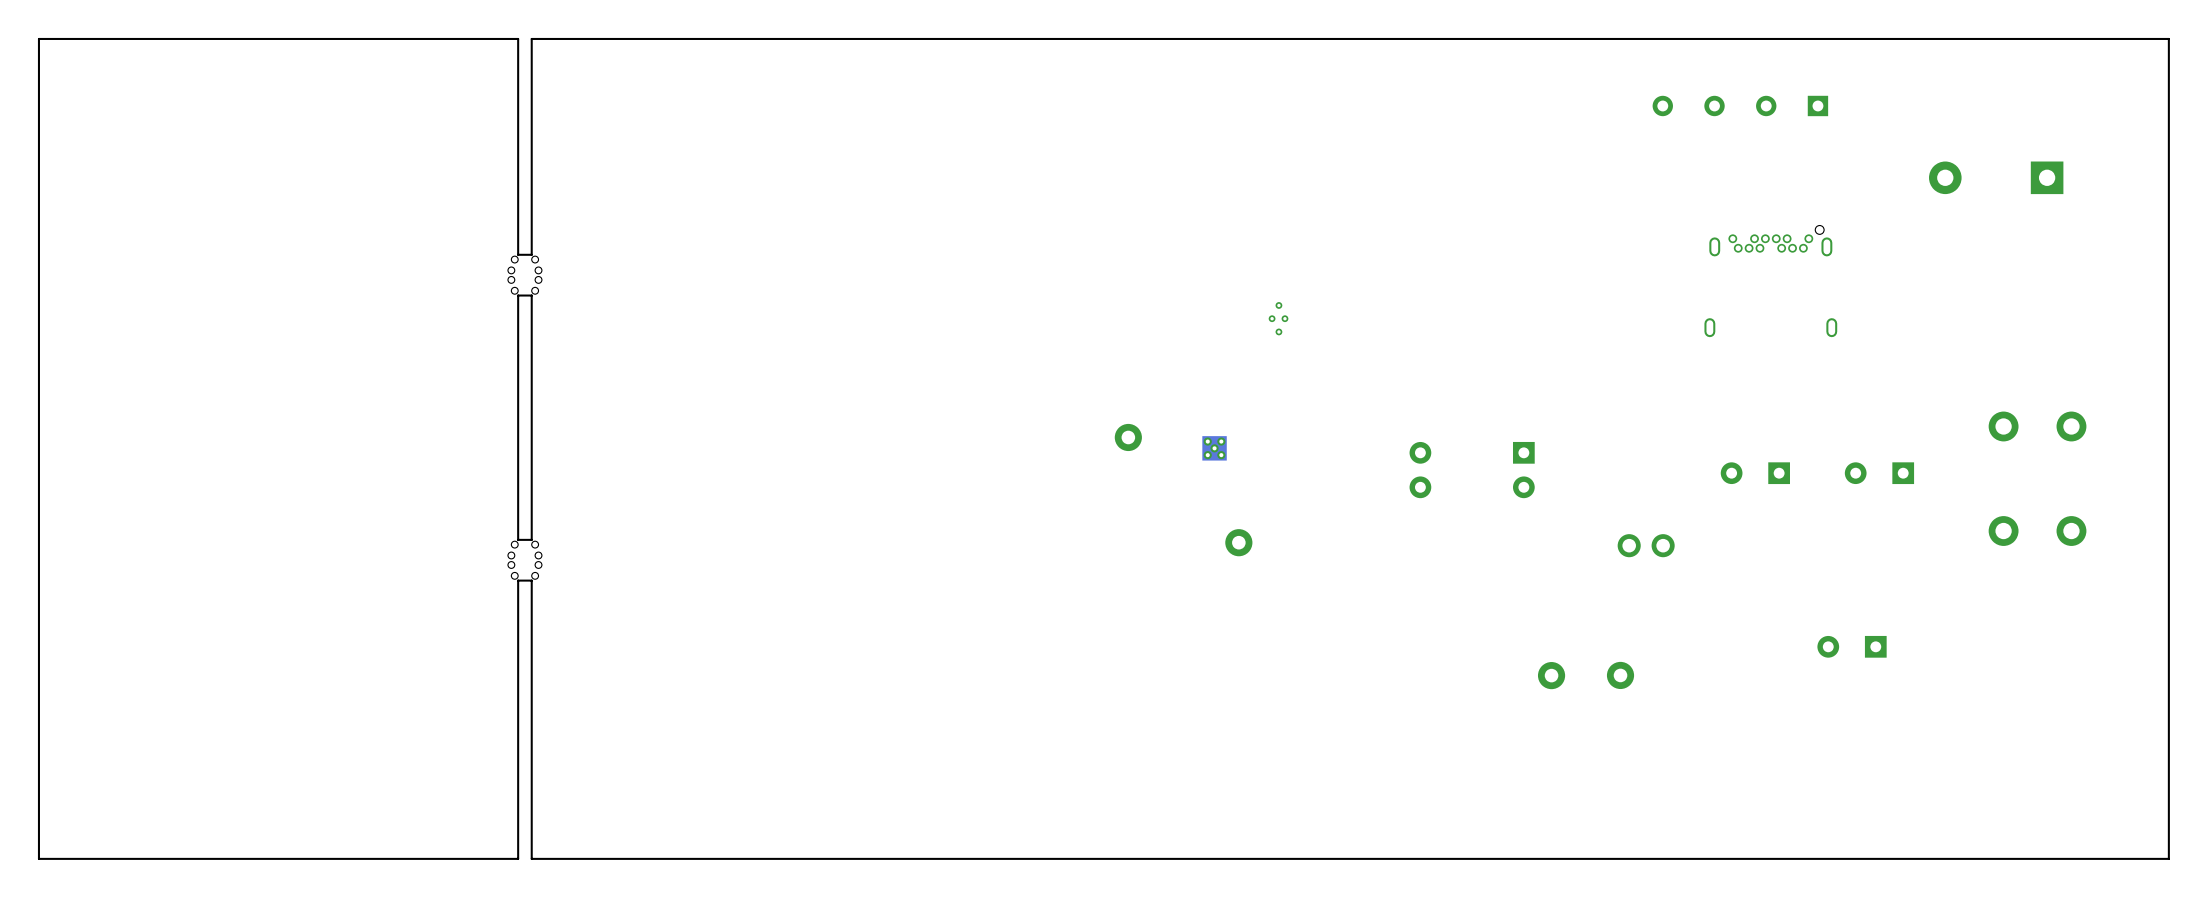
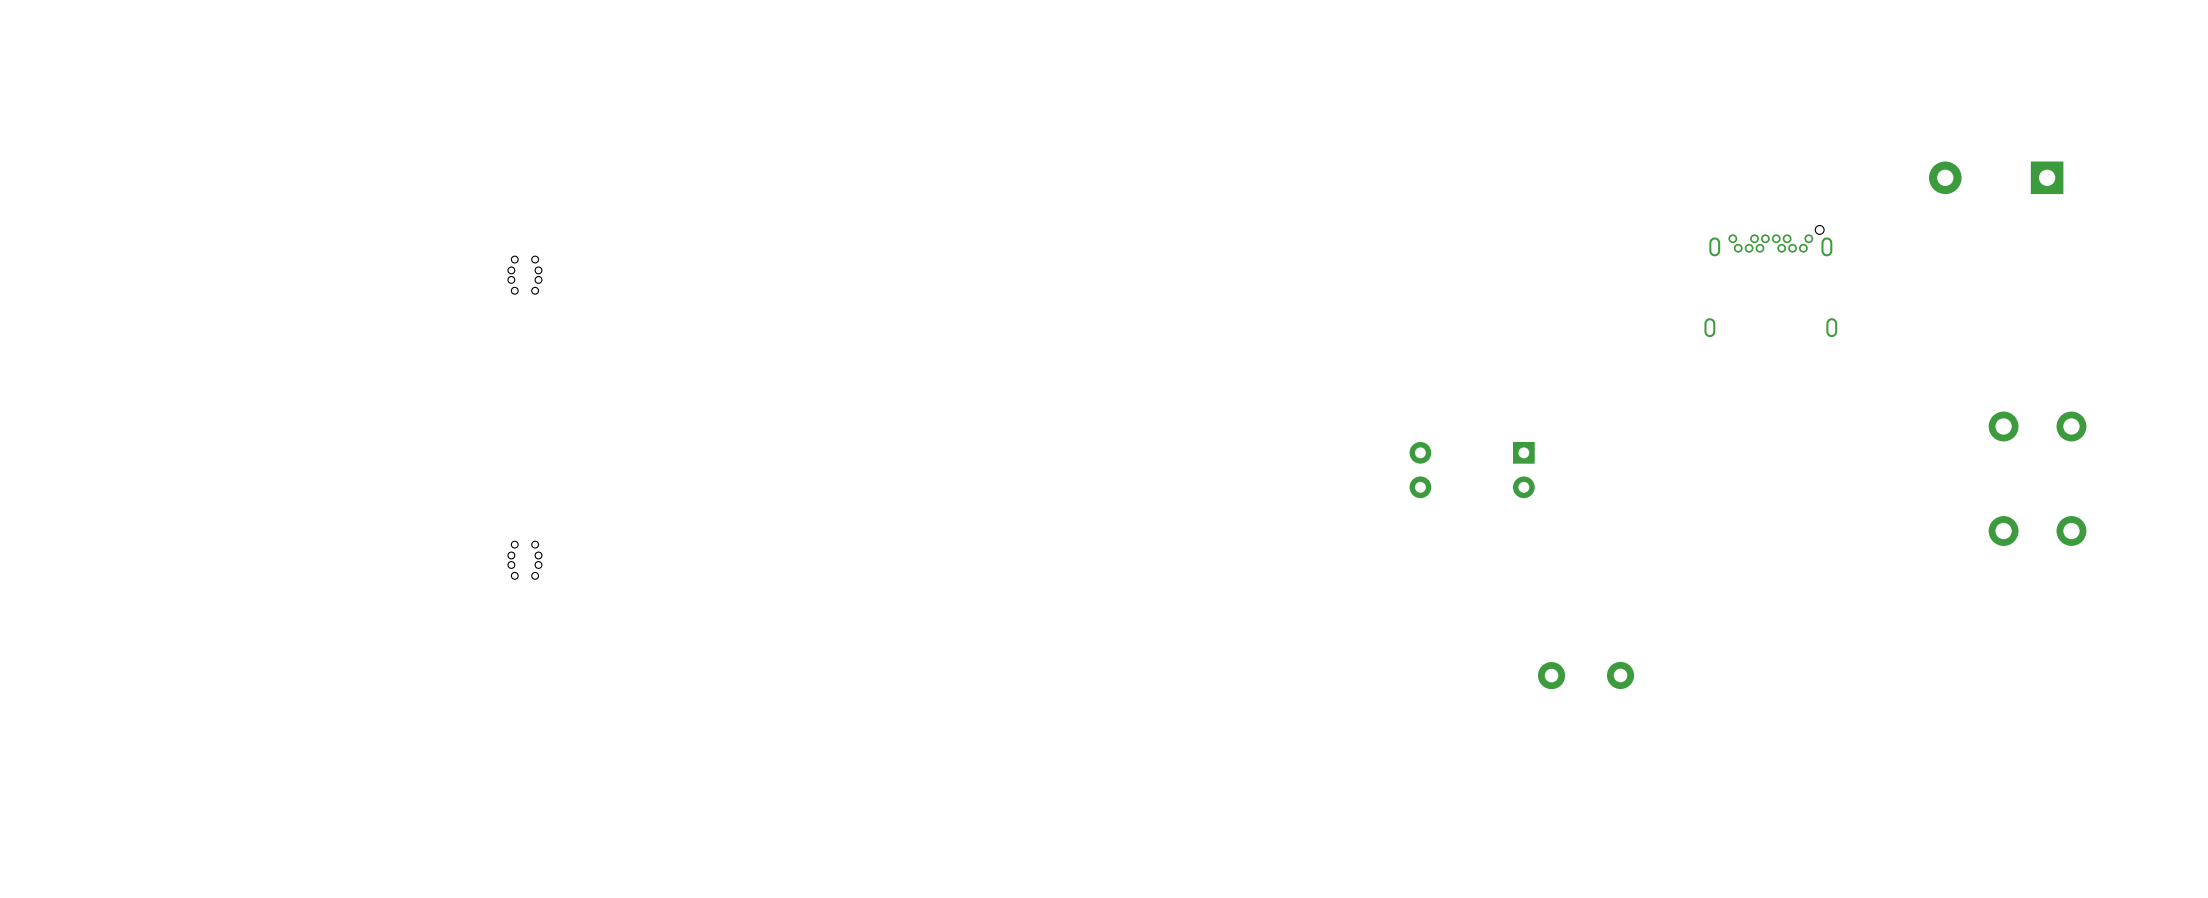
board edge: (2168, 38) (2168, 858) (531, 858) (531, 580) (518, 580) (518, 858) (38, 858) (38, 38) (518, 38) (518, 254) (531, 254) (531, 38) (2168, 38) -> none
part: (1740, 105) -> none
board edge: (531, 295) (518, 295) (518, 539) (531, 539) (531, 295) -> none
part: (1278, 318) -> none
part: (1128, 437) -> none
part: (1214, 448) -> none
part: (1755, 473) -> none
part: (1879, 473) -> none
part: (1238, 542) -> none
part: (1646, 545) -> none
part: (1852, 646) -> none

